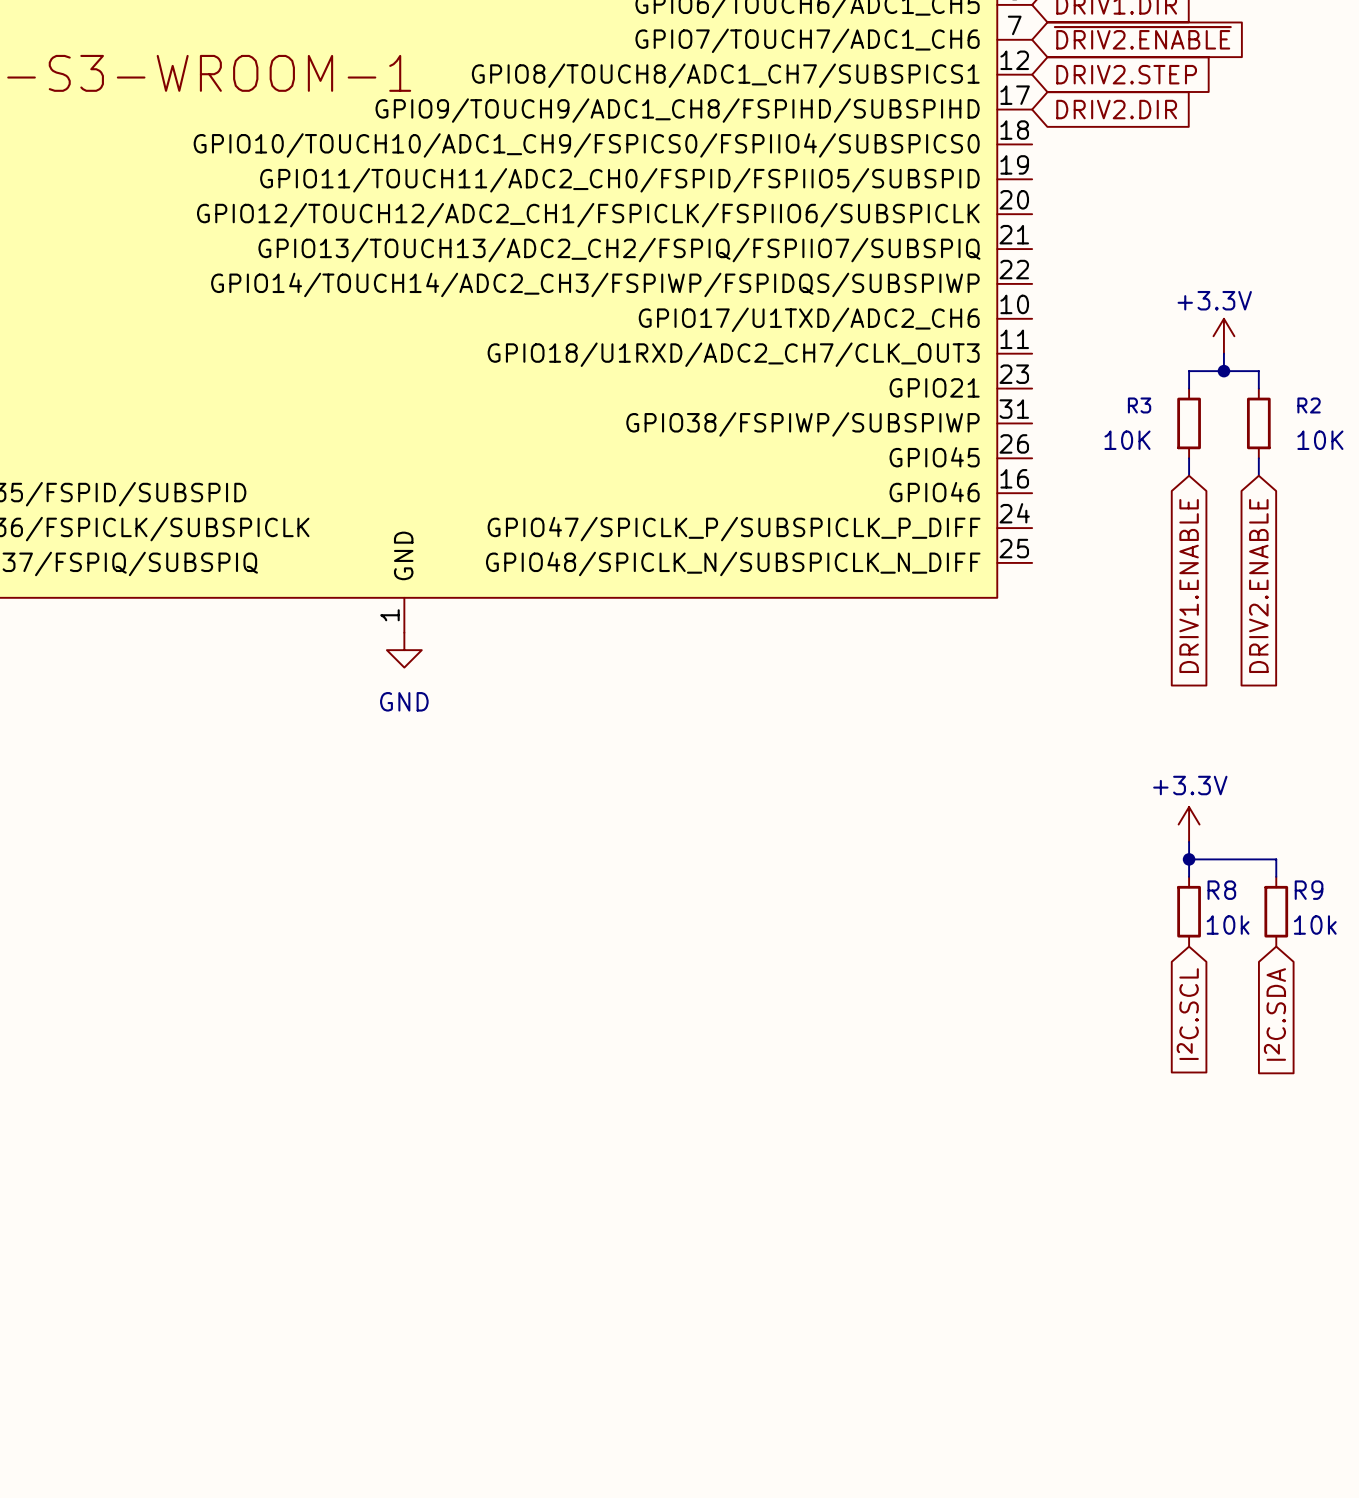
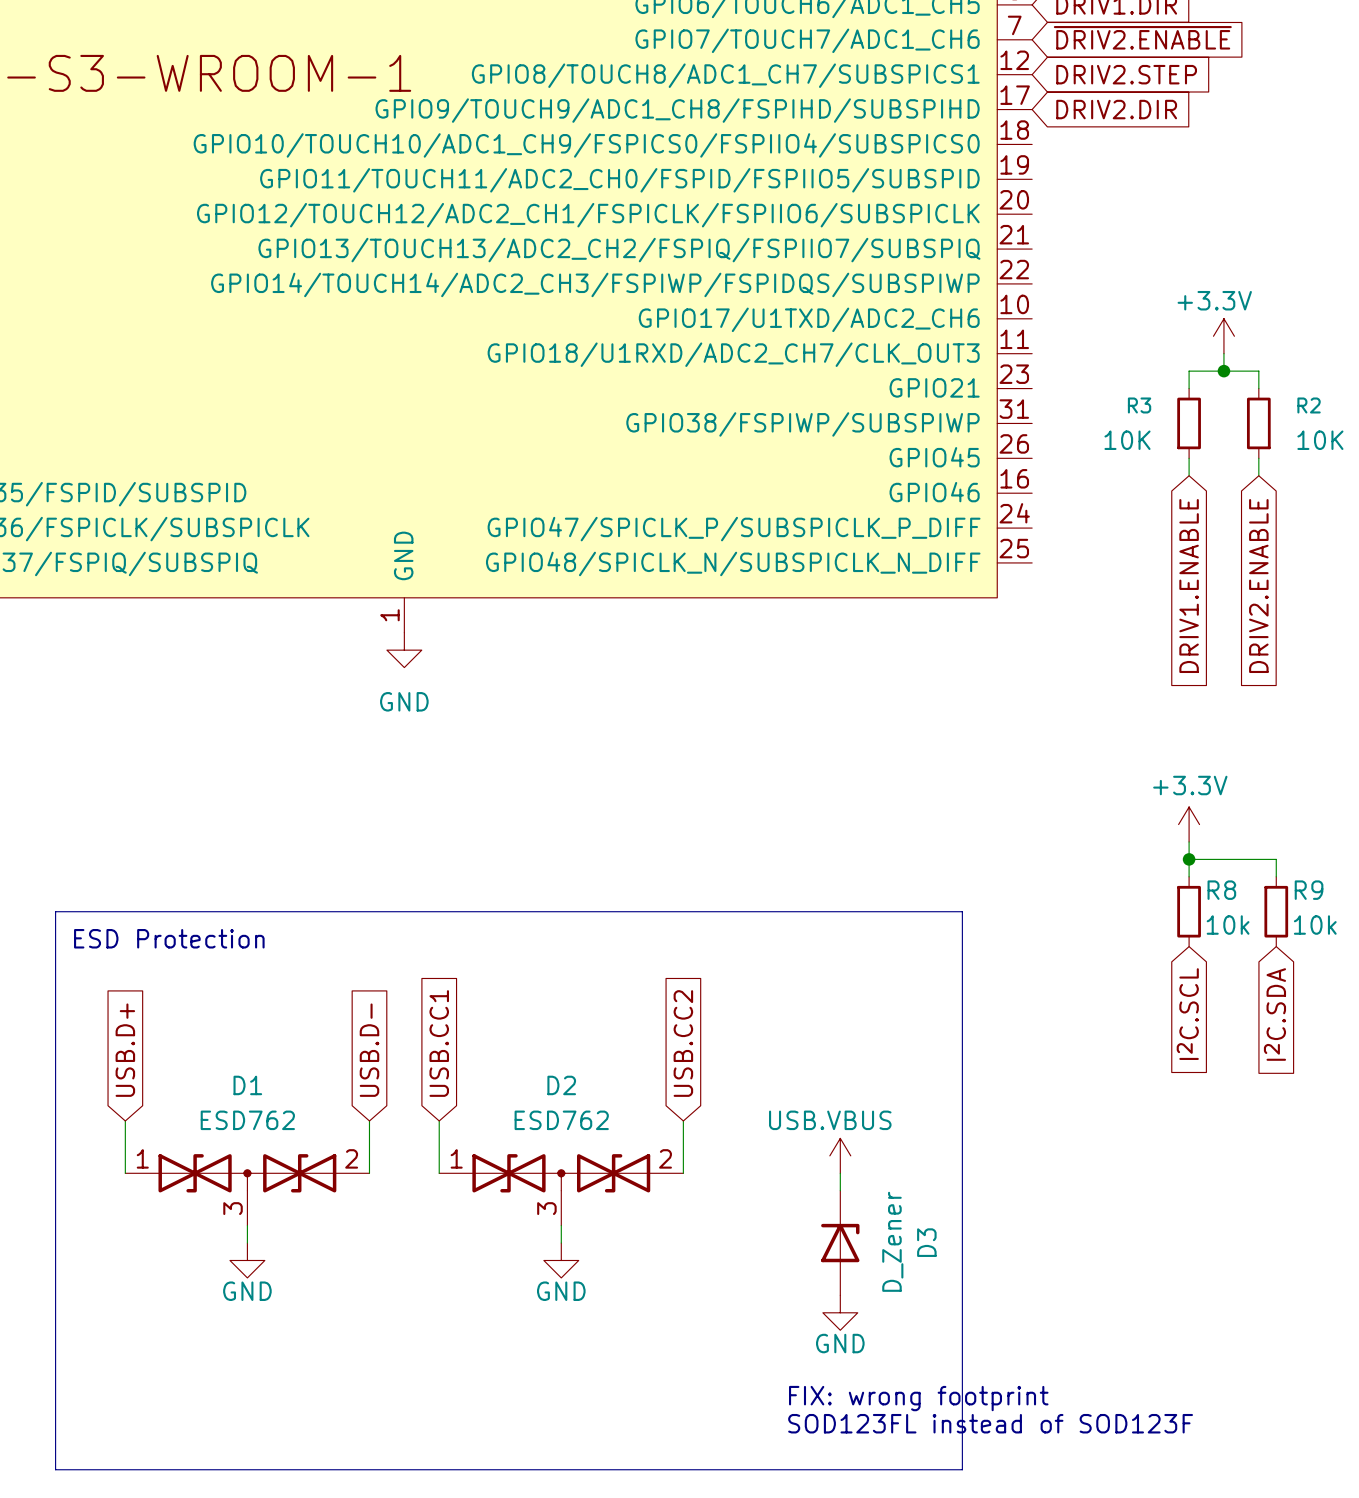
line: none -> (55, 911) (962, 911) (962, 1469) (55, 1469) (55, 911)
text: none -> ESD Protection (169, 938)
global label: none -> USB.CC1 (439, 1043)
global label: none -> USB.CC2 (683, 1043)
global label: none -> USB.D+ (125, 1050)
global label: none -> USB.D- (369, 1050)
wire: none -> (125, 1120) (125, 1173)
wire: none -> (369, 1120) (369, 1173)
wire: none -> (439, 1120) (439, 1173)
wire: none -> (683, 1120) (683, 1173)
power symbol: none -> USB.VBUS (840, 1155)
wire: none -> (840, 1173) (840, 1190)
D1: none -> ESD762 (247, 1189)
D2: none -> ESD762 (561, 1189)
wire: none -> (247, 1225) (247, 1243)
wire: none -> (561, 1225) (561, 1243)
D3: none -> D_Zener (840, 1243)
power symbol: none -> GND (247, 1260)
power symbol: none -> GND (561, 1260)
power symbol: none -> GND (840, 1312)
text: none -> FIX: wrong footprint (918, 1398)
text: none -> SOD123FL instead of SOD123F (990, 1423)

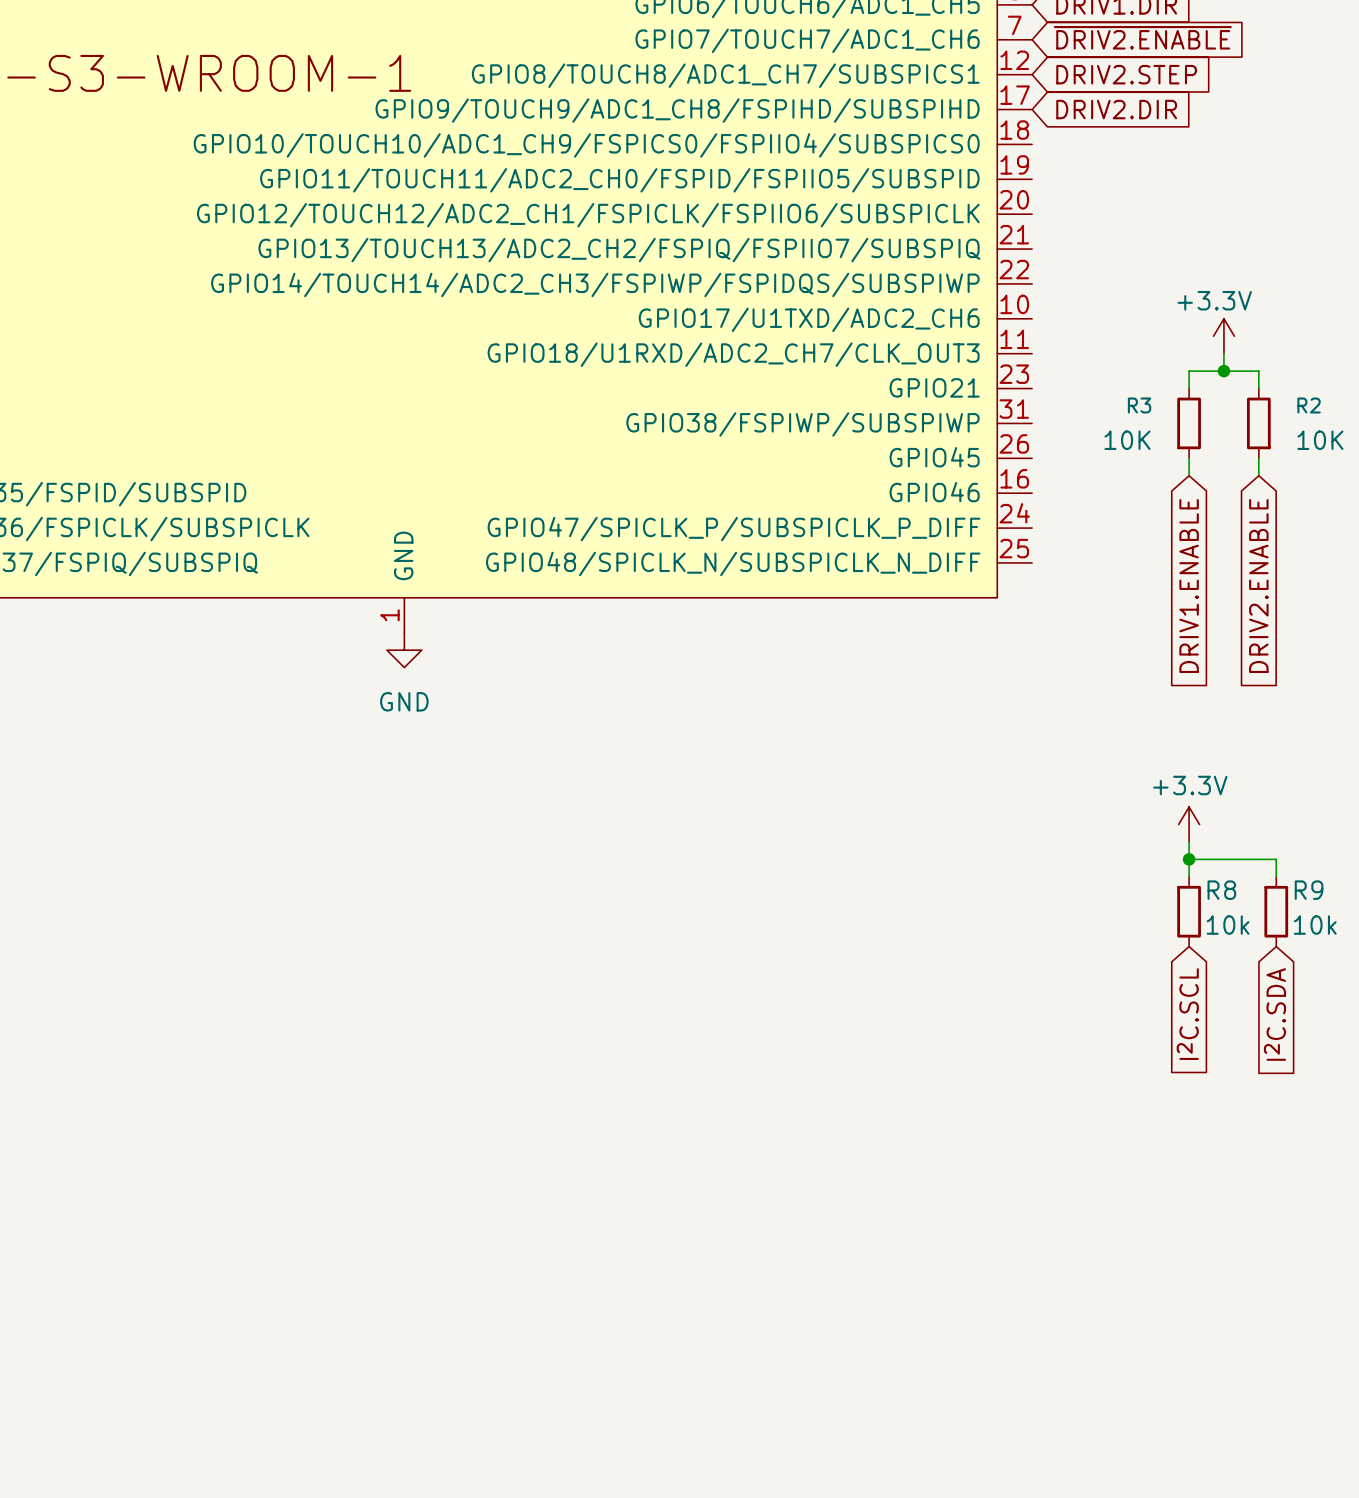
line: (55, 911) (962, 911) (962, 1469) (55, 1469) (55, 911) -> none
text: ESD Protection (169, 938) -> none
global label: USB.CC1 (439, 1043) -> none
global label: USB.CC2 (683, 1043) -> none
global label: USB.D+ (125, 1050) -> none
global label: USB.D- (369, 1050) -> none
wire: (125, 1120) (125, 1173) -> none
wire: (369, 1120) (369, 1173) -> none
wire: (439, 1120) (439, 1173) -> none
wire: (683, 1120) (683, 1173) -> none
power symbol: USB.VBUS (840, 1155) -> none
wire: (840, 1173) (840, 1190) -> none
D1: ESD762 (247, 1189) -> none
D2: ESD762 (561, 1189) -> none
wire: (247, 1225) (247, 1243) -> none
wire: (561, 1225) (561, 1243) -> none
D3: D_Zener (840, 1243) -> none
power symbol: GND (247, 1260) -> none
power symbol: GND (561, 1260) -> none
power symbol: GND (840, 1312) -> none
text: FIX: wrong footprint (918, 1398) -> none
text: SOD123FL instead of SOD123F (990, 1423) -> none

